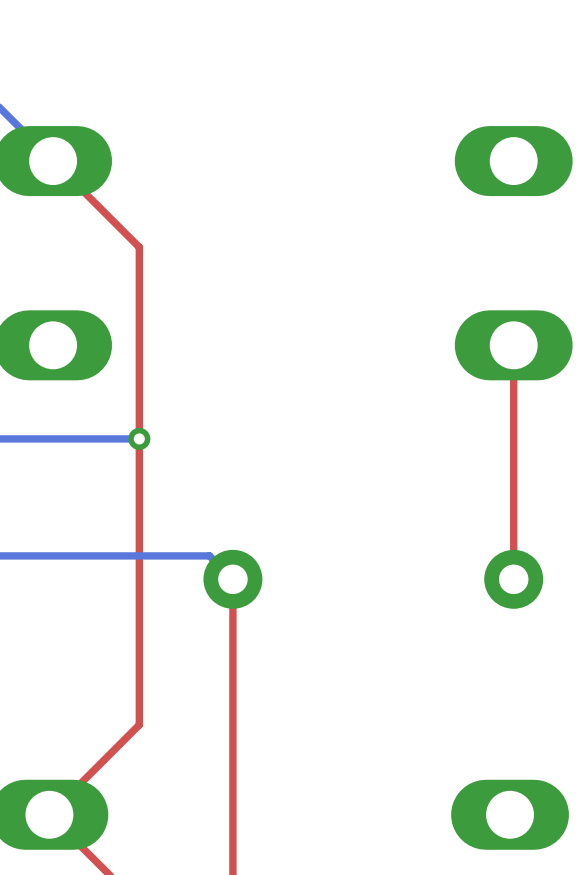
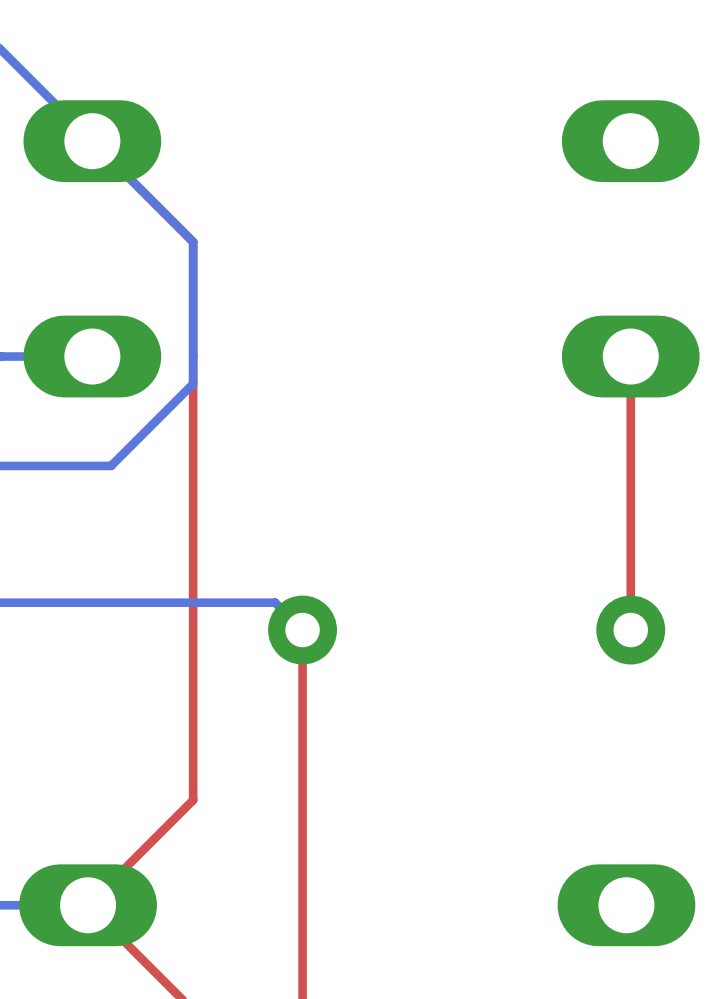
bottom track: (139, 438) (69, 438) -> (92, 141) (193, 241) (193, 383) (111, 465)
via: (139, 438) -> none

